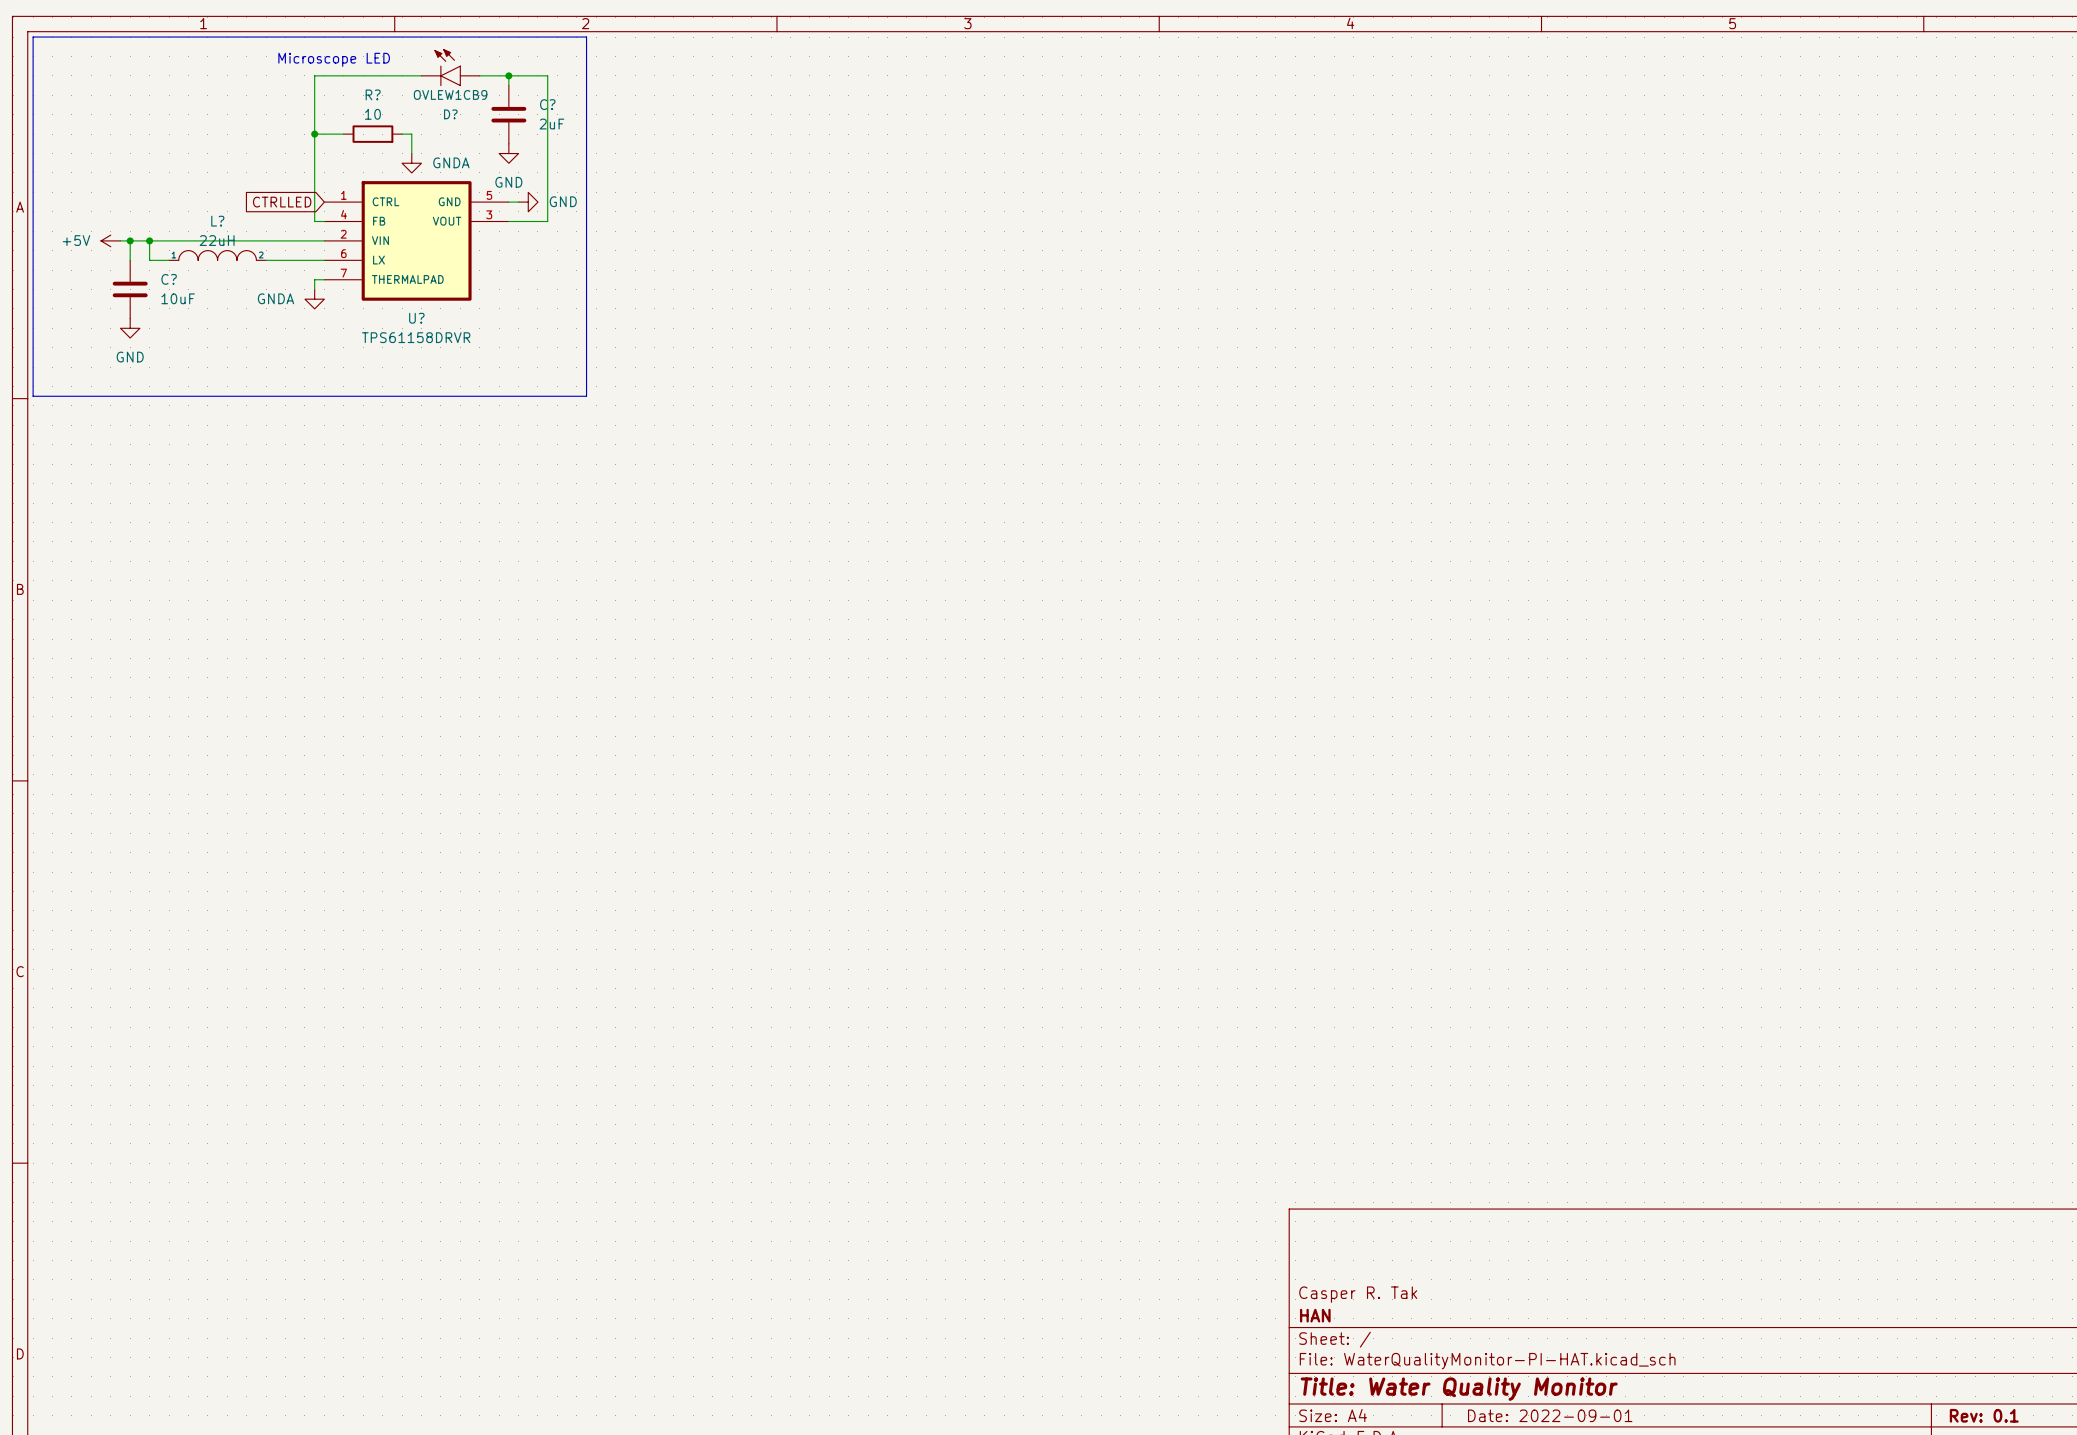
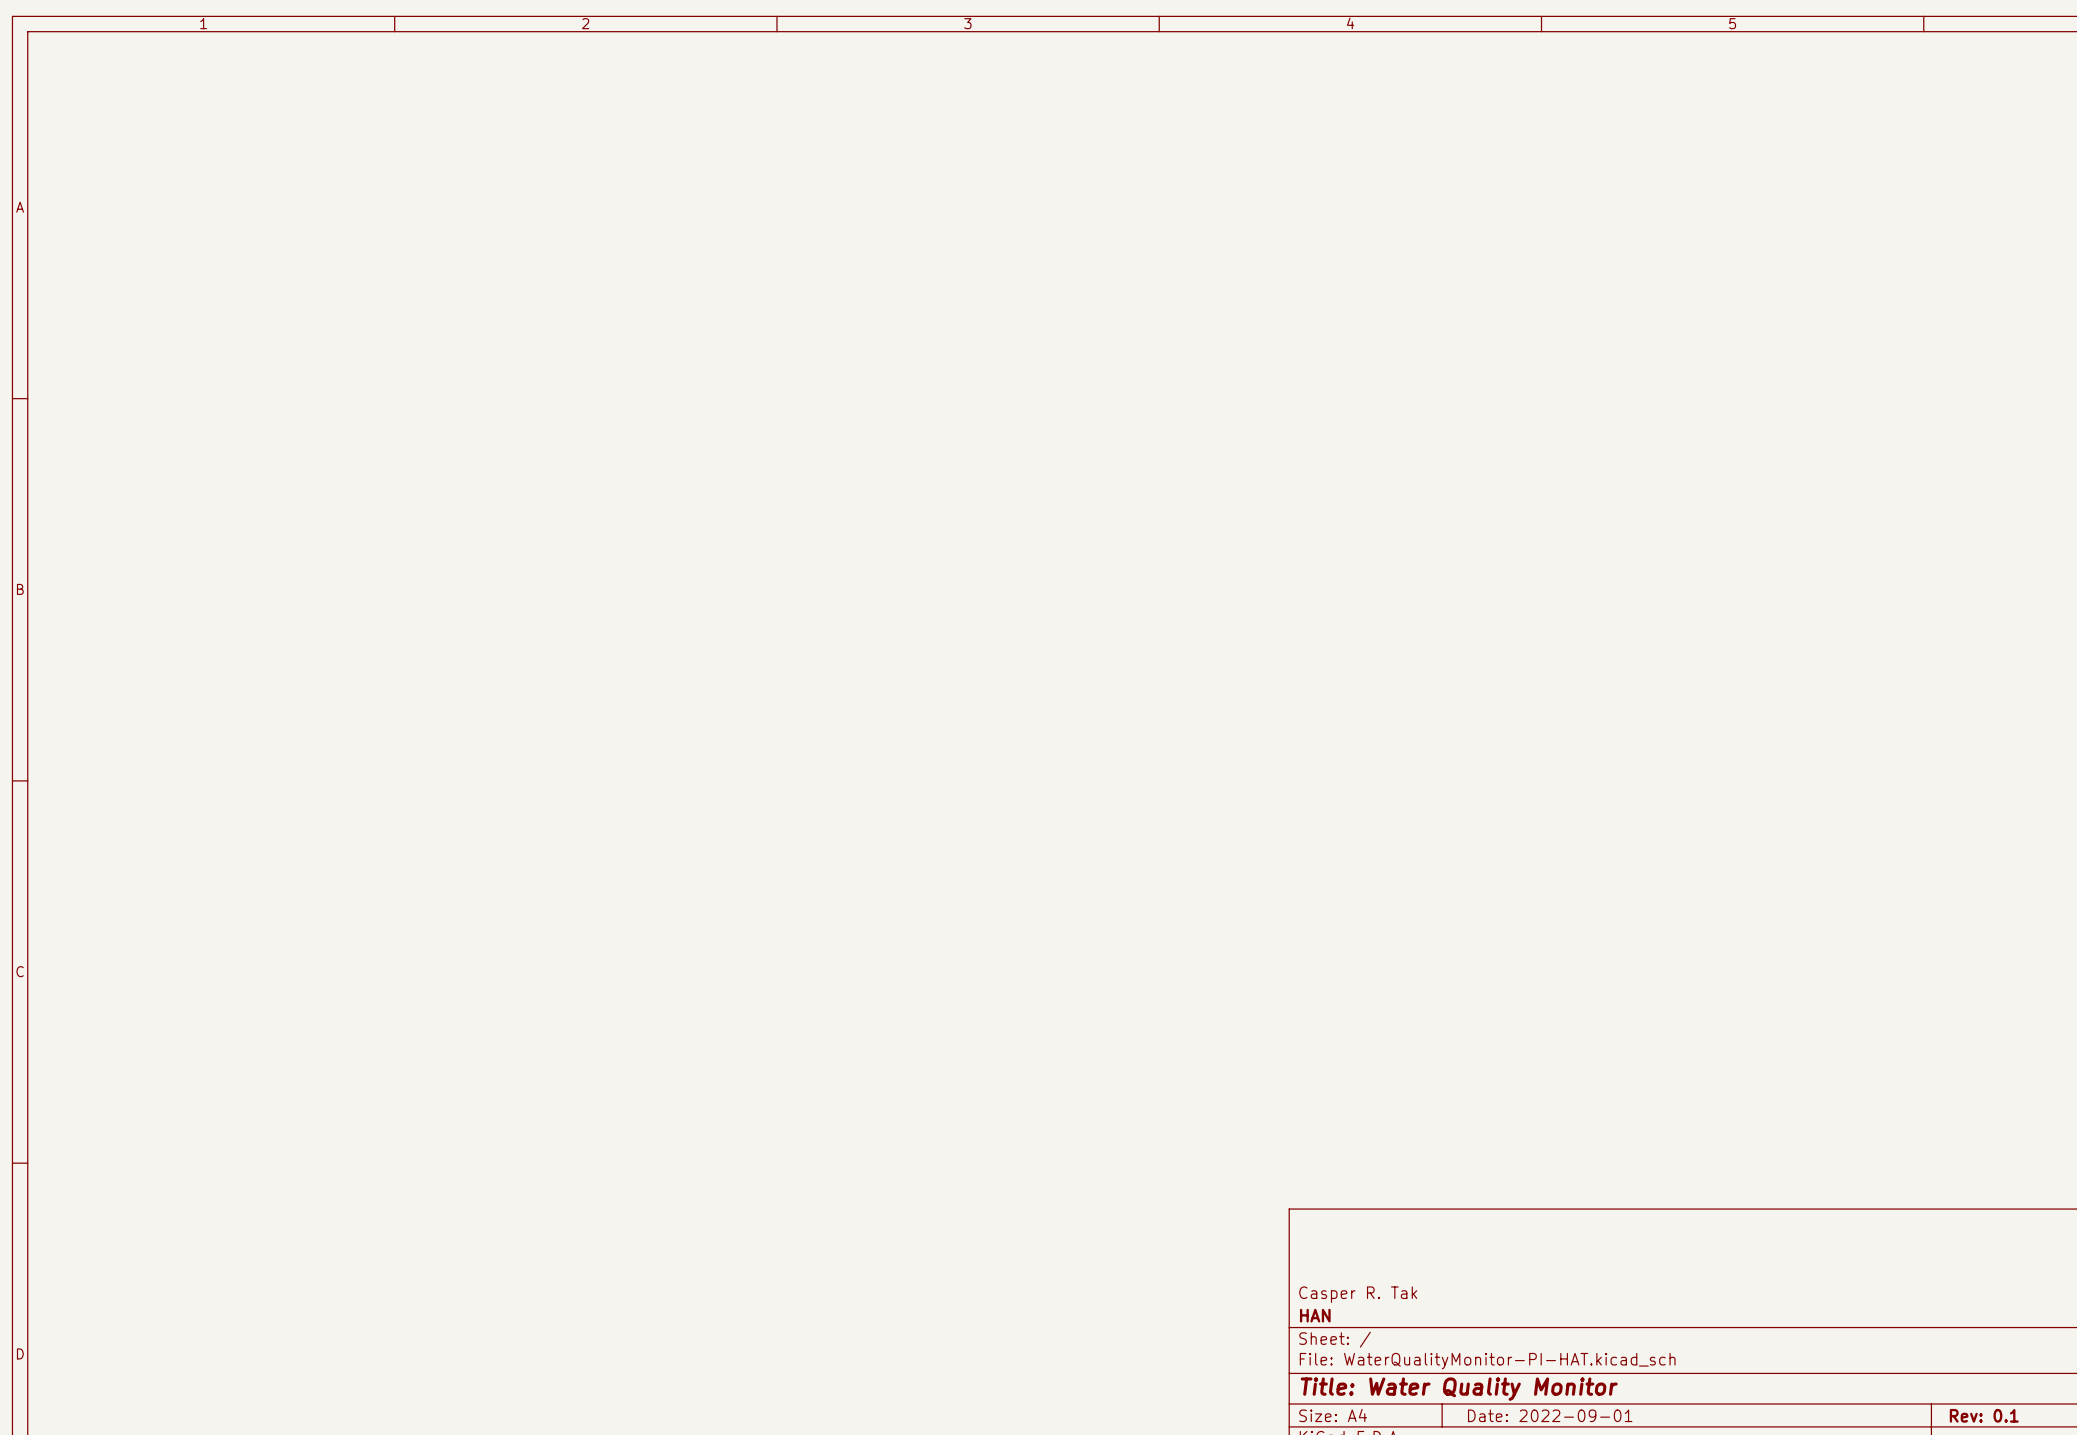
line: (33, 37) (586, 37) (586, 396) (33, 396) (33, 37) -> none
text: Microscope LED (334, 59) -> none
D?: OVLEW1CB9 (450, 67) -> none
wire: (421, 75) (314, 75) (314, 221) (324, 221) -> none
wire: (479, 75) (547, 75) (547, 221) (508, 221) -> none
wire: (508, 75) (508, 85) -> none
junction: (508, 75) -> none
C?: 2uF (508, 114) -> none
wire: (314, 134) (343, 134) -> none
junction: (314, 134) -> none
R?: 10 (372, 134) -> none
wire: (402, 134) (411, 134) (411, 153) -> none
power symbol: GND (508, 153) -> none
power symbol: GNDA (411, 163) -> none
global label: CTRLLED (282, 202) -> none
wire: (508, 202) (518, 202) -> none
power symbol: GND (528, 202) -> none
power symbol: +5V (110, 240) -> none
wire: (120, 240) (324, 240) -> none
wire: (130, 240) (130, 260) -> none
junction: (130, 240) -> none
wire: (149, 240) (149, 260) (169, 260) -> none
junction: (149, 240) -> none
U?: TPS61158DRVR (416, 240) -> none
L?: 22uH (217, 255) -> none
wire: (266, 260) (324, 260) -> none
wire: (324, 279) (314, 279) (314, 289) -> none
C?: 10uF (130, 289) -> none
power symbol: GNDA (314, 299) -> none
power symbol: GND (130, 328) -> none

